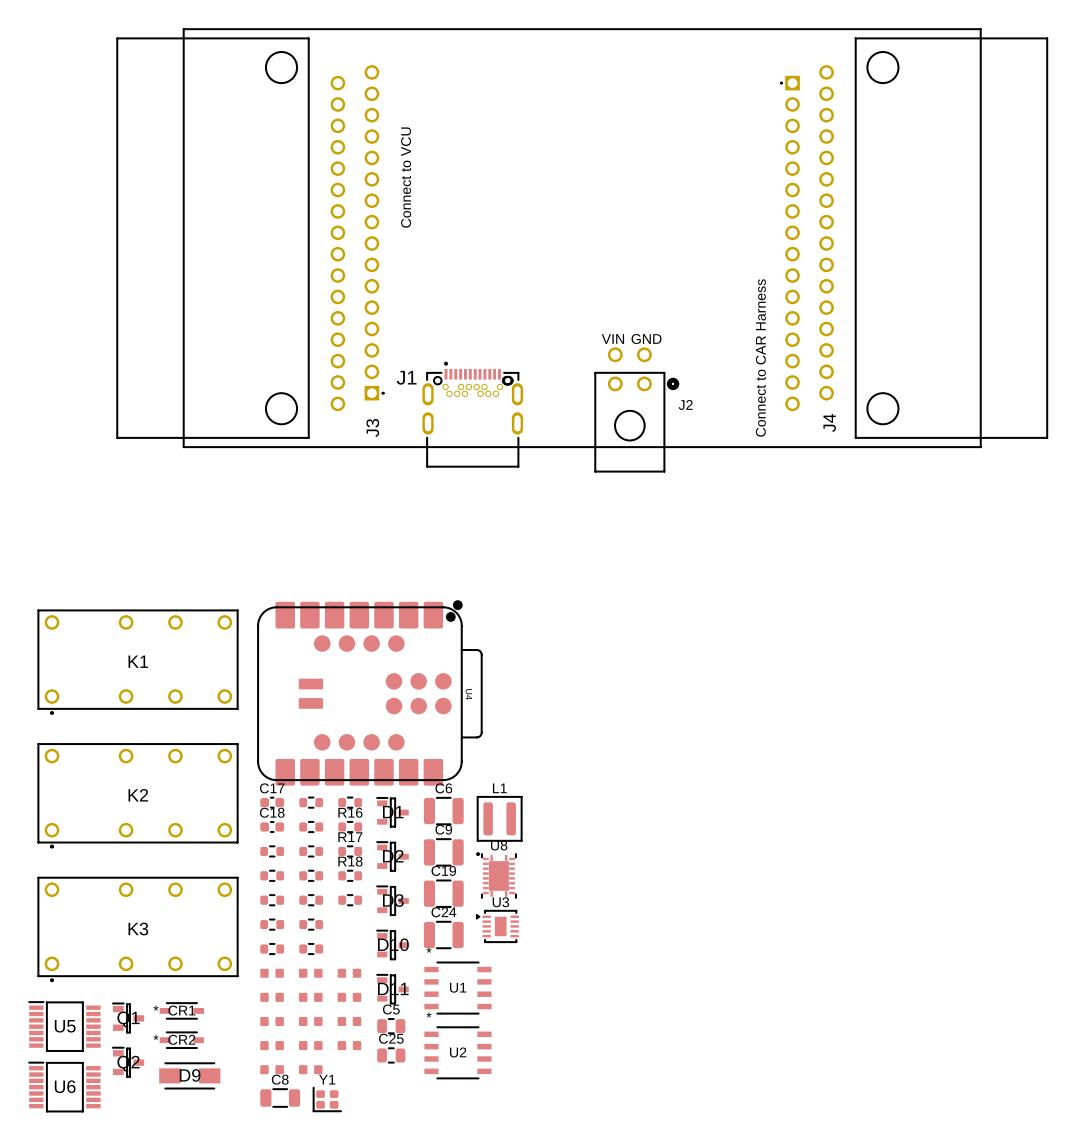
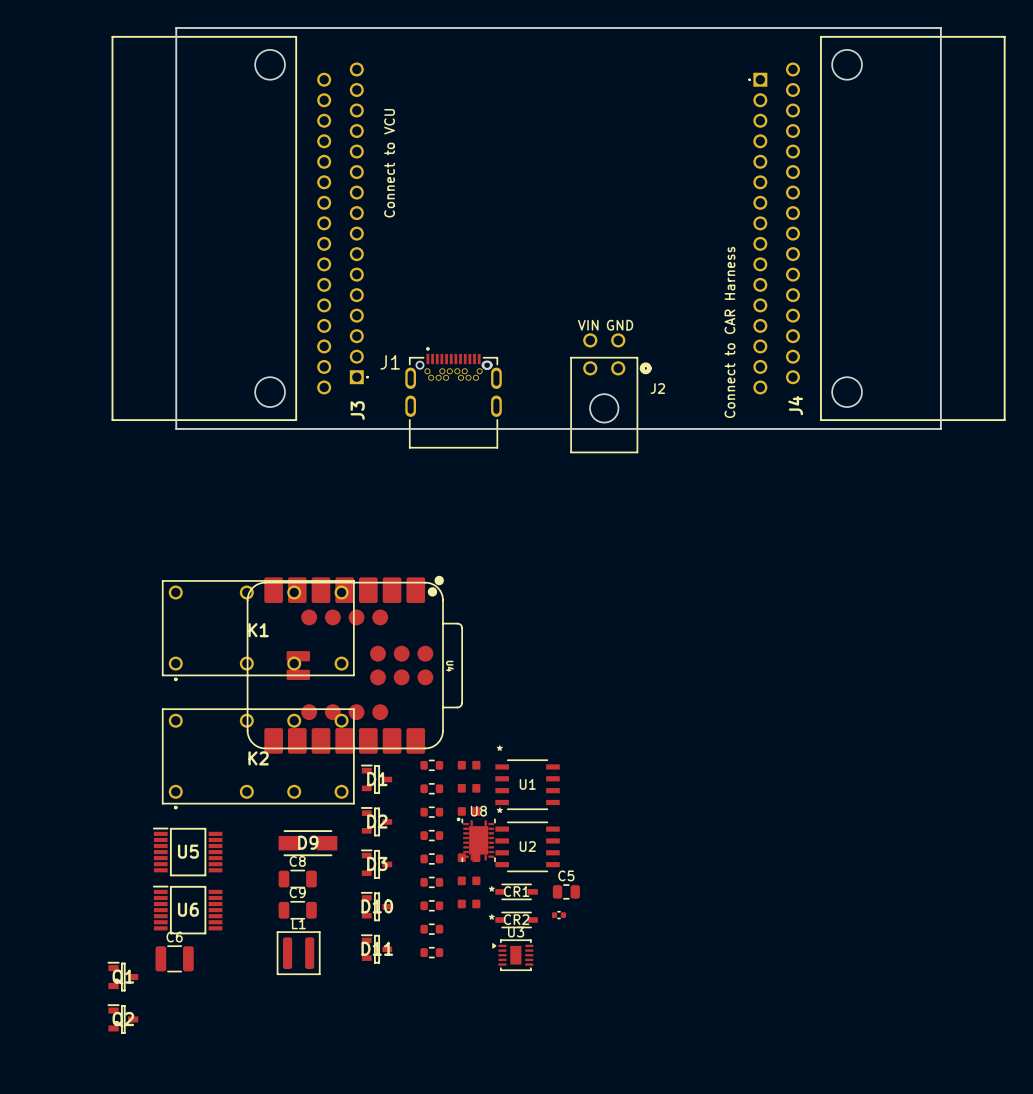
K1 position: (138, 662) -> (258, 630)
K2 position: (138, 796) -> (258, 759)
part: none -> (431, 765)
part: none -> (469, 765)
C17: (272, 802) -> none
part: (311, 802) -> none
part: (350, 802) -> none
C6 position: (443, 811) -> (174, 958)
L1 position: (499, 818) -> (298, 953)
part: none -> (469, 788)
part: none -> (431, 788)
C18: (272, 827) -> none
part: (311, 827) -> none
R16: (350, 827) -> none
C9 footprint: [423, 838, 464, 867] -> [278, 901, 317, 920]
part: none -> (469, 811)
part: none -> (431, 812)
part: (272, 851) -> none
part: (311, 851) -> none
R17: (350, 851) -> none
part: none -> (431, 835)
part: (272, 875) -> none
part: (311, 875) -> none
R18: (350, 875) -> none
C19: (443, 893) -> none
part: none -> (469, 857)
part: none -> (431, 858)
part: (272, 900) -> none
part: (311, 900) -> none
part: (350, 900) -> none
part: none -> (469, 880)
part: none -> (431, 882)
part: (272, 924) -> none
part: (311, 924) -> none
U3 position: (497, 926) -> (512, 955)
K3: (138, 929) -> none
C24: (443, 935) -> none
part: none -> (469, 903)
part: none -> (431, 905)
part: (272, 949) -> none
part: (311, 949) -> none
part: none -> (558, 915)
part: none -> (431, 929)
part: (272, 973) -> none
part: (310, 973) -> none
part: (349, 973) -> none
U1 position: (457, 988) -> (527, 784)
part: none -> (431, 952)
part: (272, 997) -> none
part: (310, 997) -> none
part: (349, 997) -> none
CR1 position: (181, 1010) -> (516, 891)
part: (272, 1021) -> none
part: (310, 1021) -> none
part: (349, 1021) -> none
U5 position: (64, 1026) -> (187, 851)
C5 position: (391, 1026) -> (566, 891)
CR2 position: (181, 1040) -> (516, 919)
part: (272, 1045) -> none
part: (310, 1045) -> none
part: (349, 1045) -> none
U2 position: (457, 1052) -> (527, 846)
C25: (391, 1055) -> none
part: (272, 1069) -> none
part: (310, 1069) -> none
D9 position: (189, 1075) -> (307, 843)
U6 position: (64, 1087) -> (187, 910)
C8 position: (280, 1098) -> (297, 879)
Y1: (327, 1099) -> none

